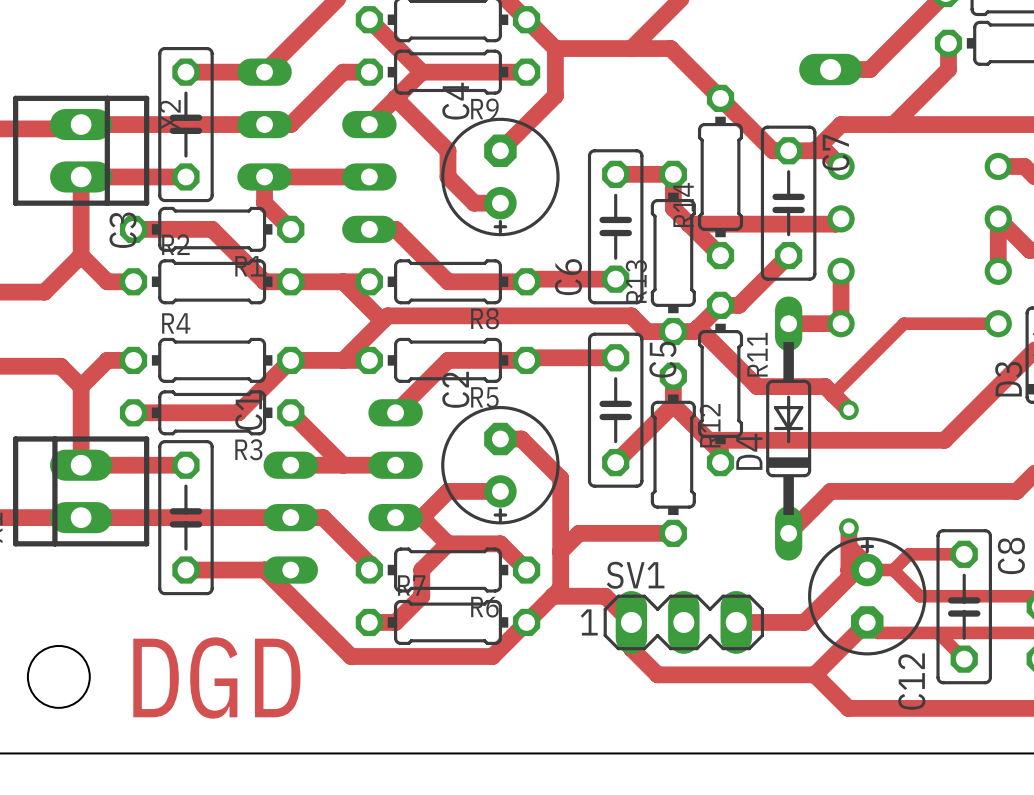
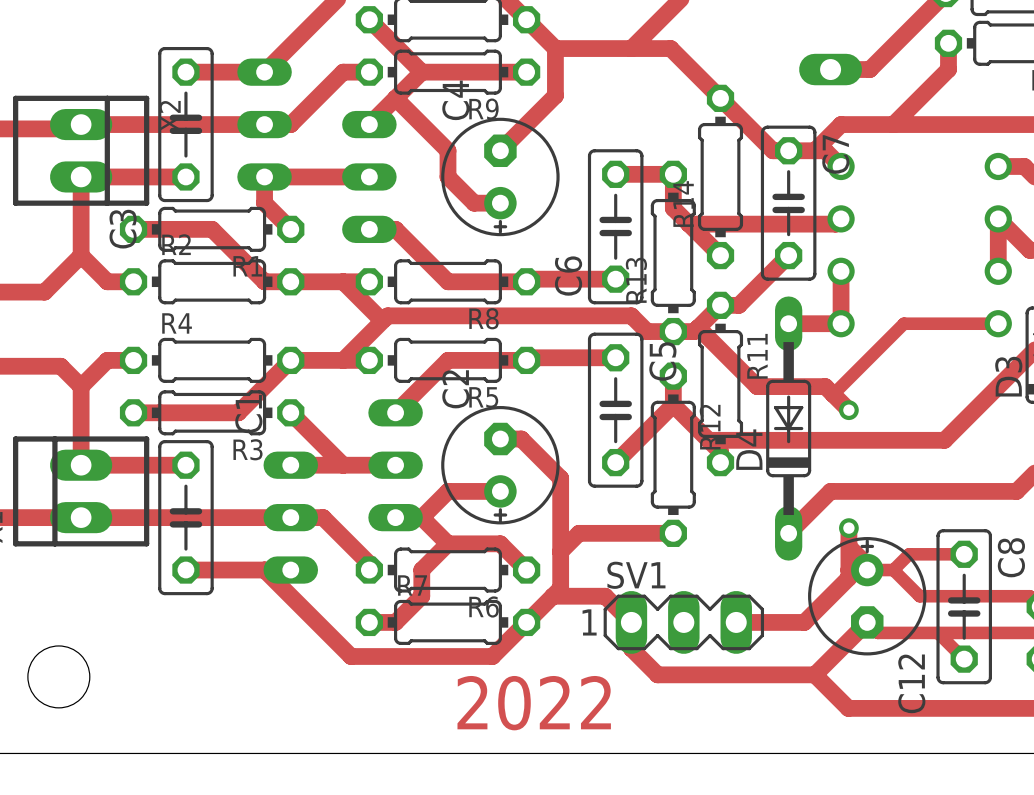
text: DGD (216, 677) -> none
text: none -> 2022 (534, 703)

